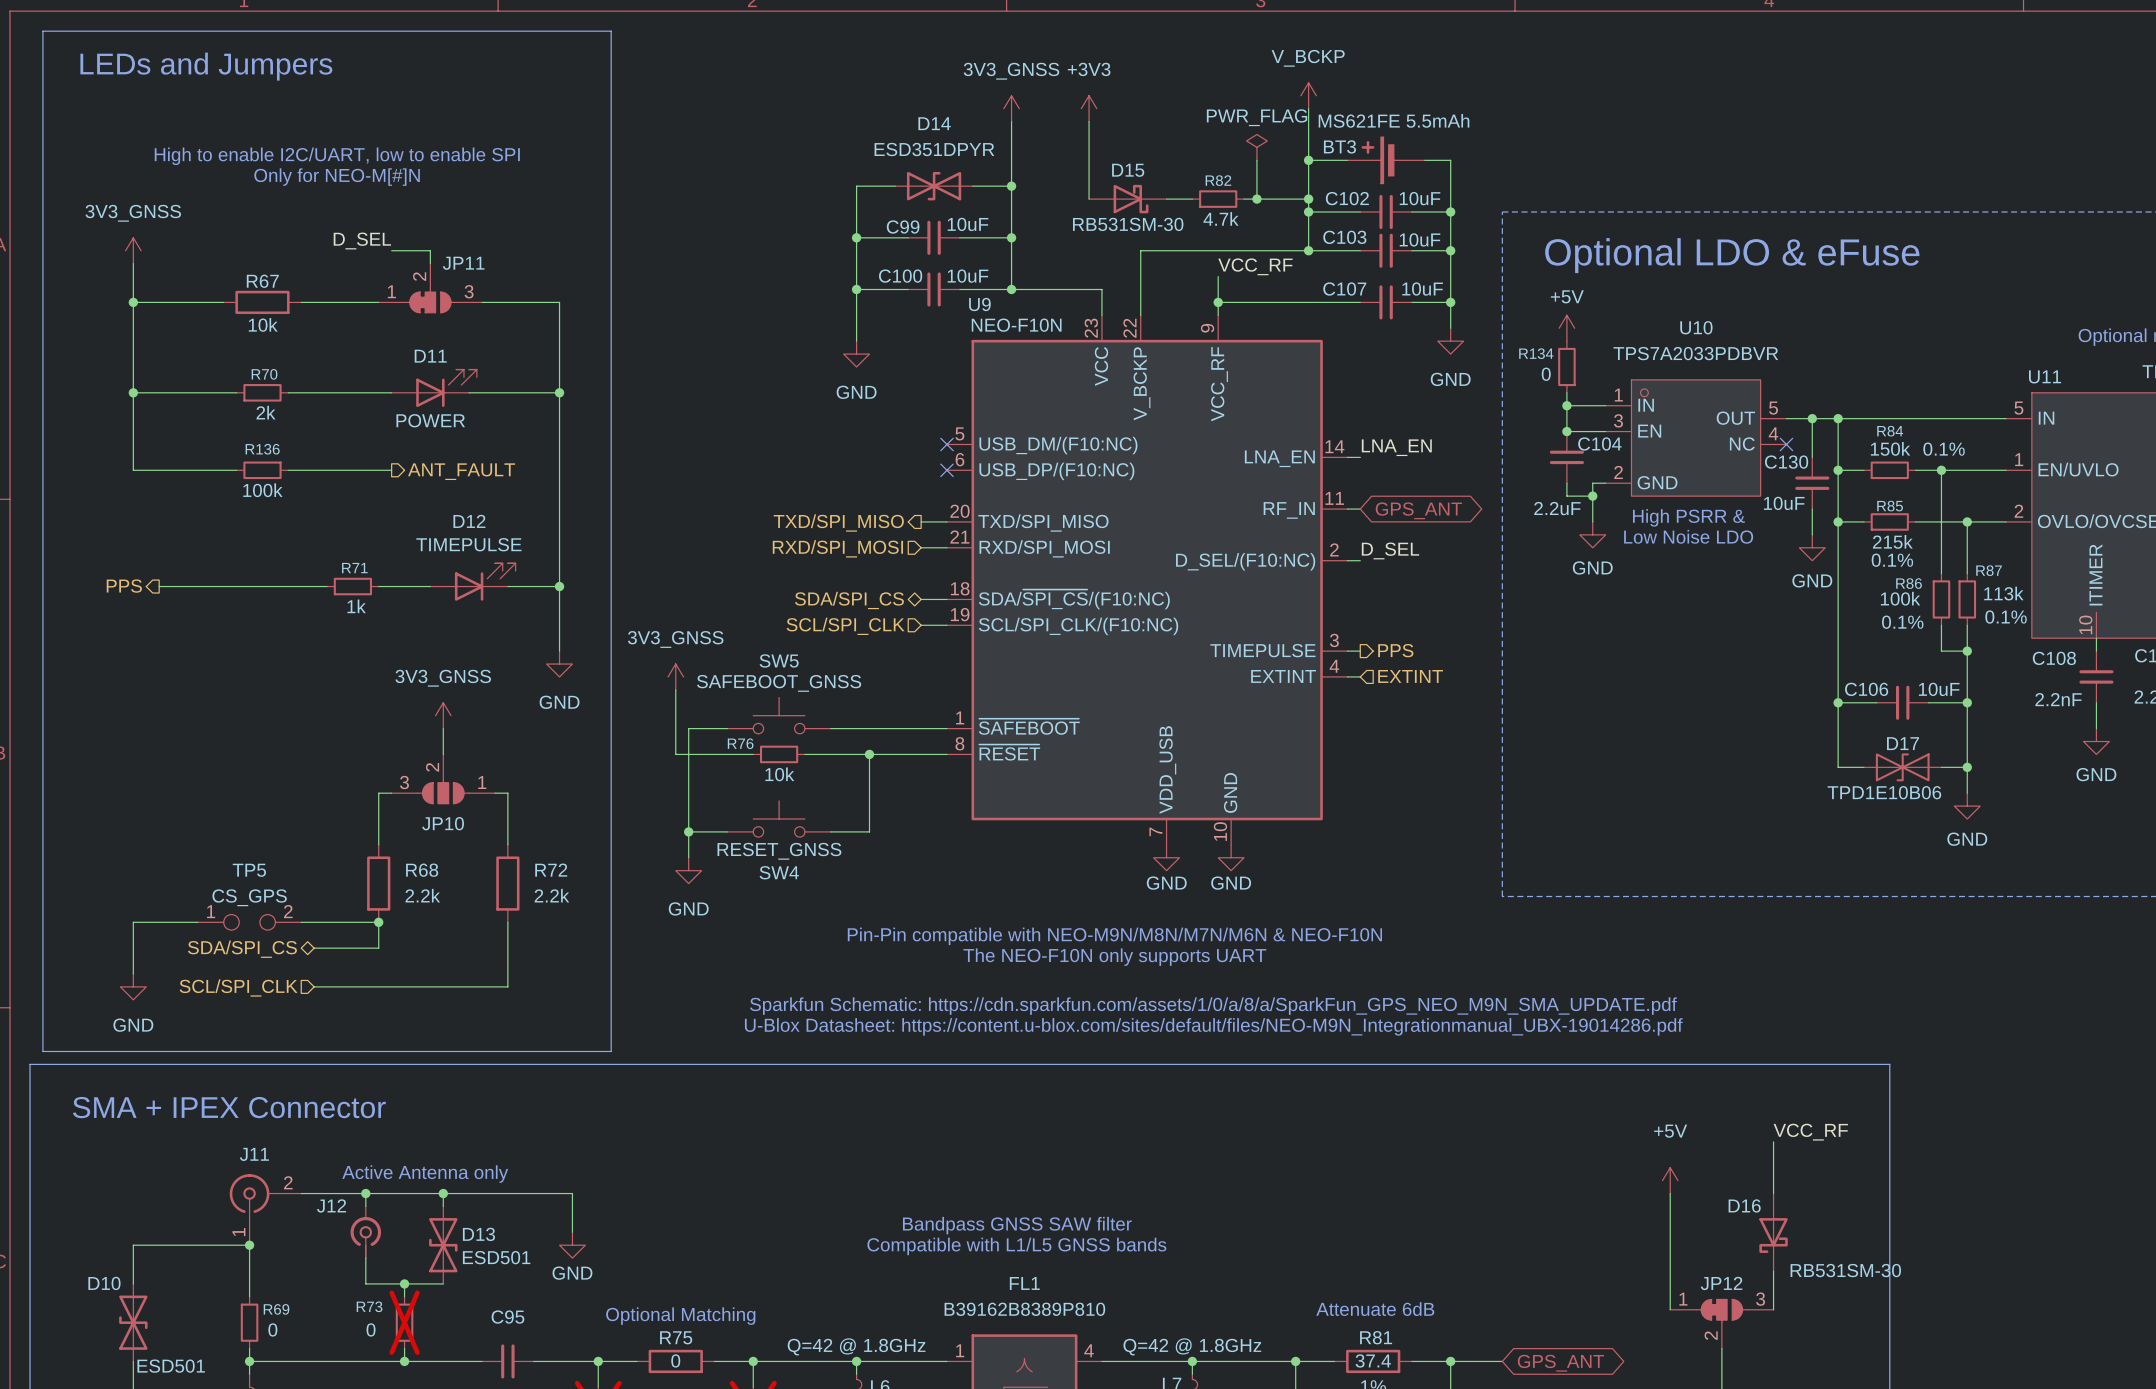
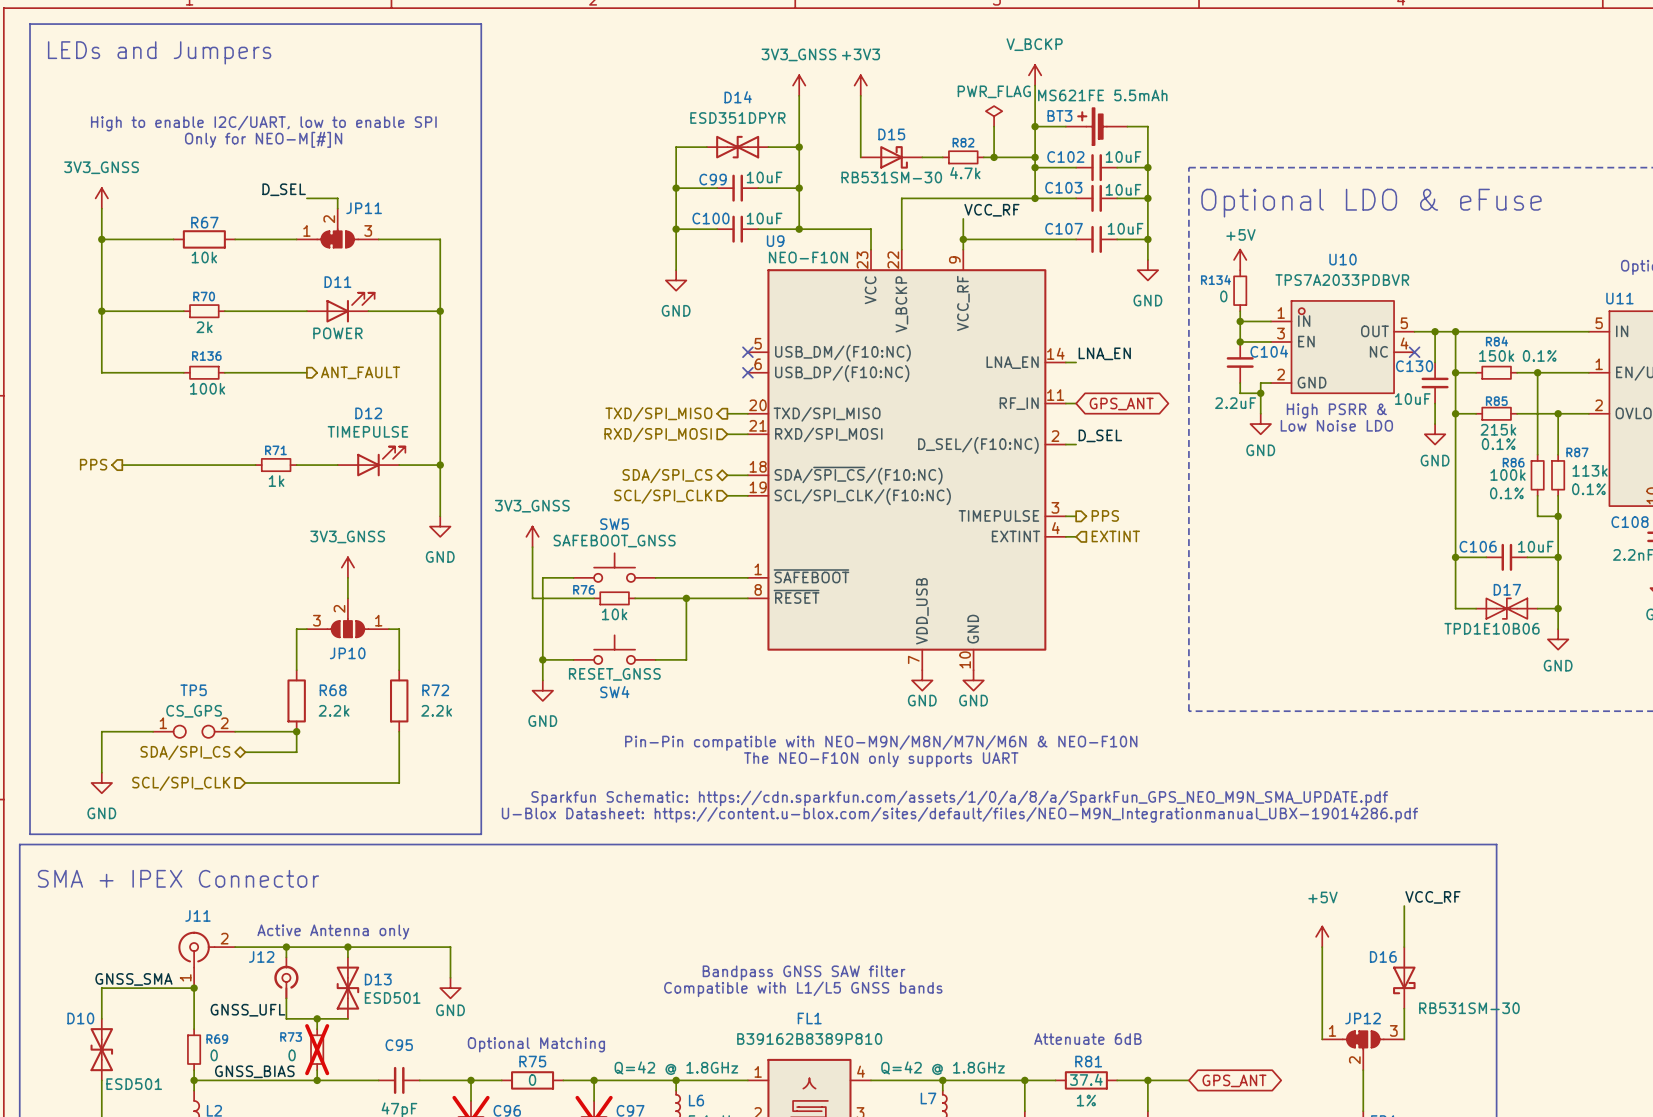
label: none -> GNSS_SMA (133, 979)
label: none -> GNSS_UFL (247, 1010)
label: none -> GNSS_BIAS (254, 1071)

